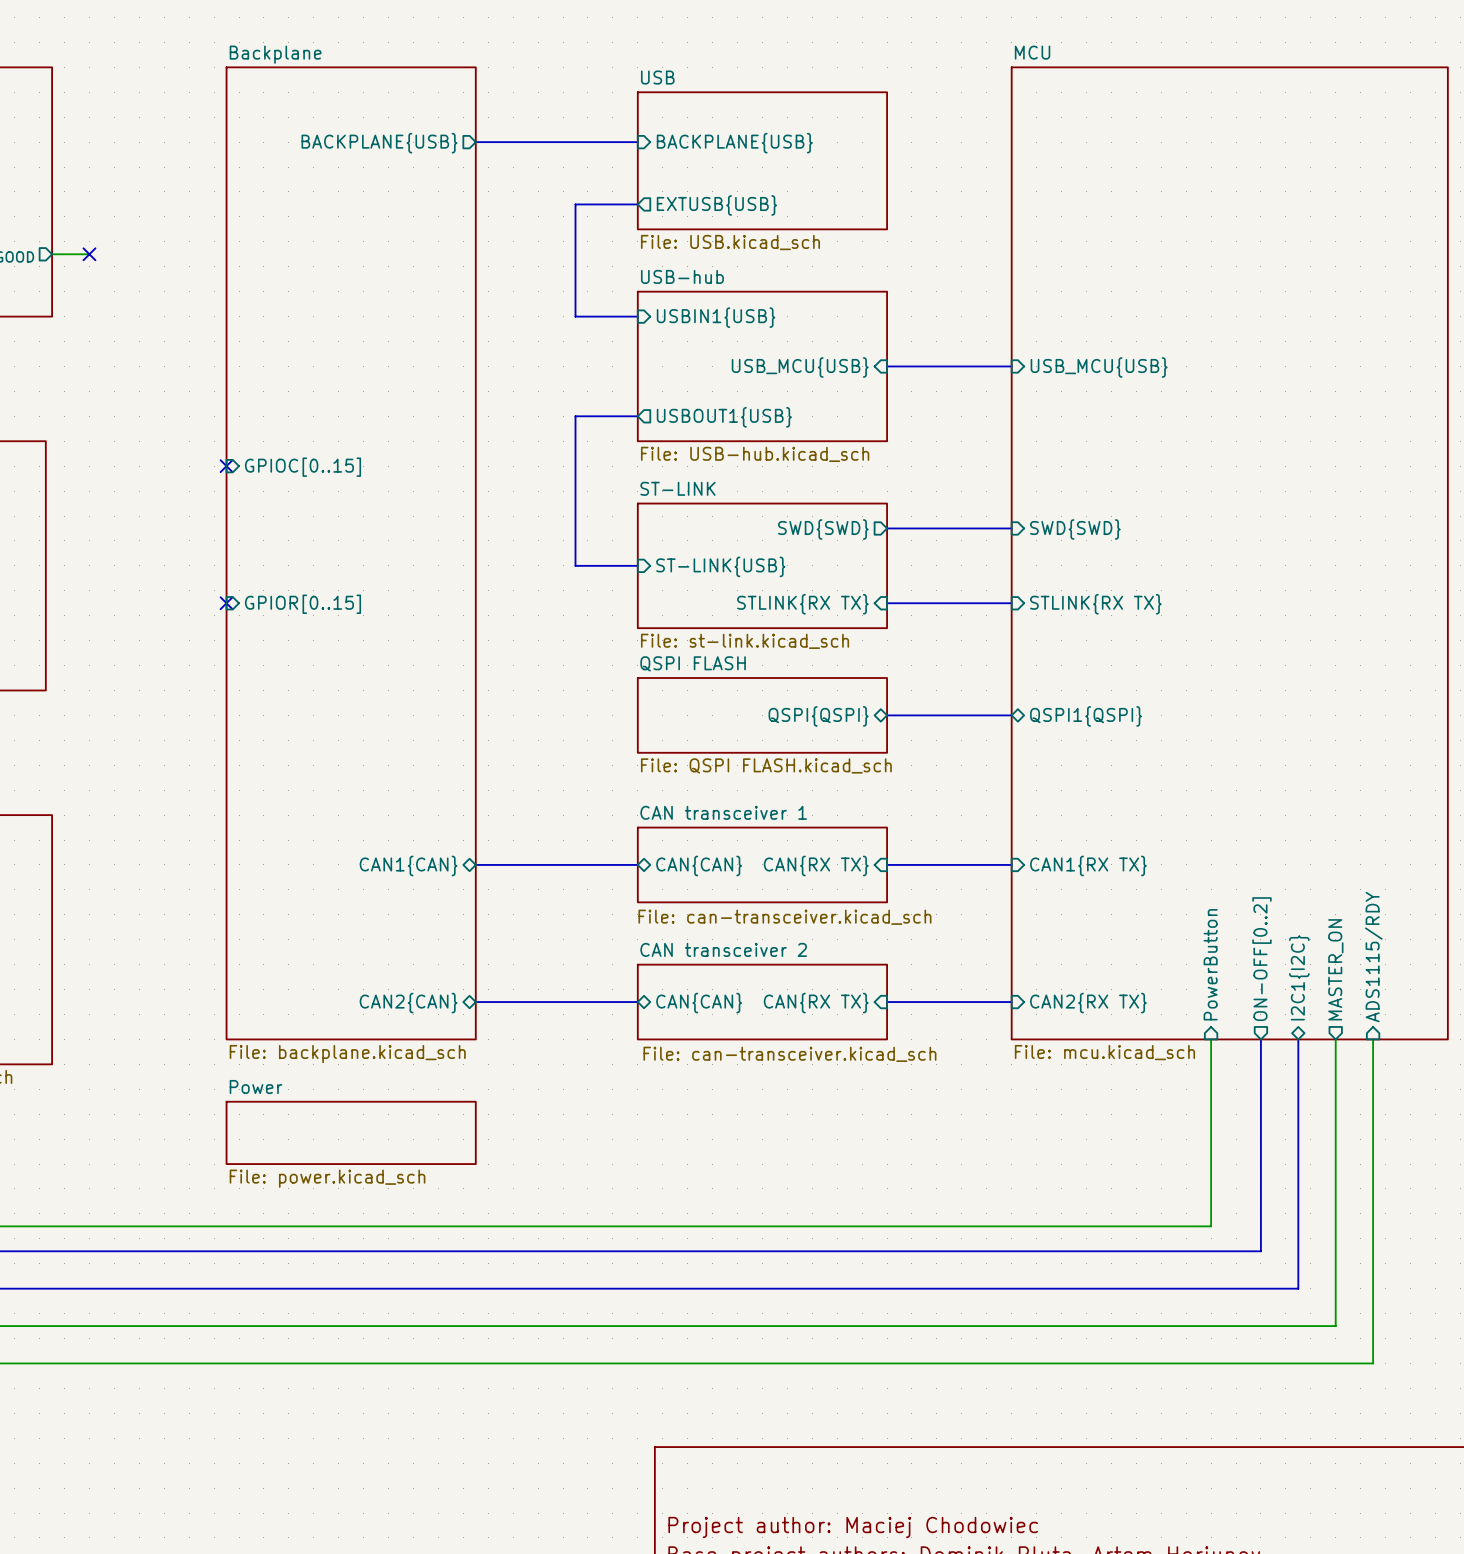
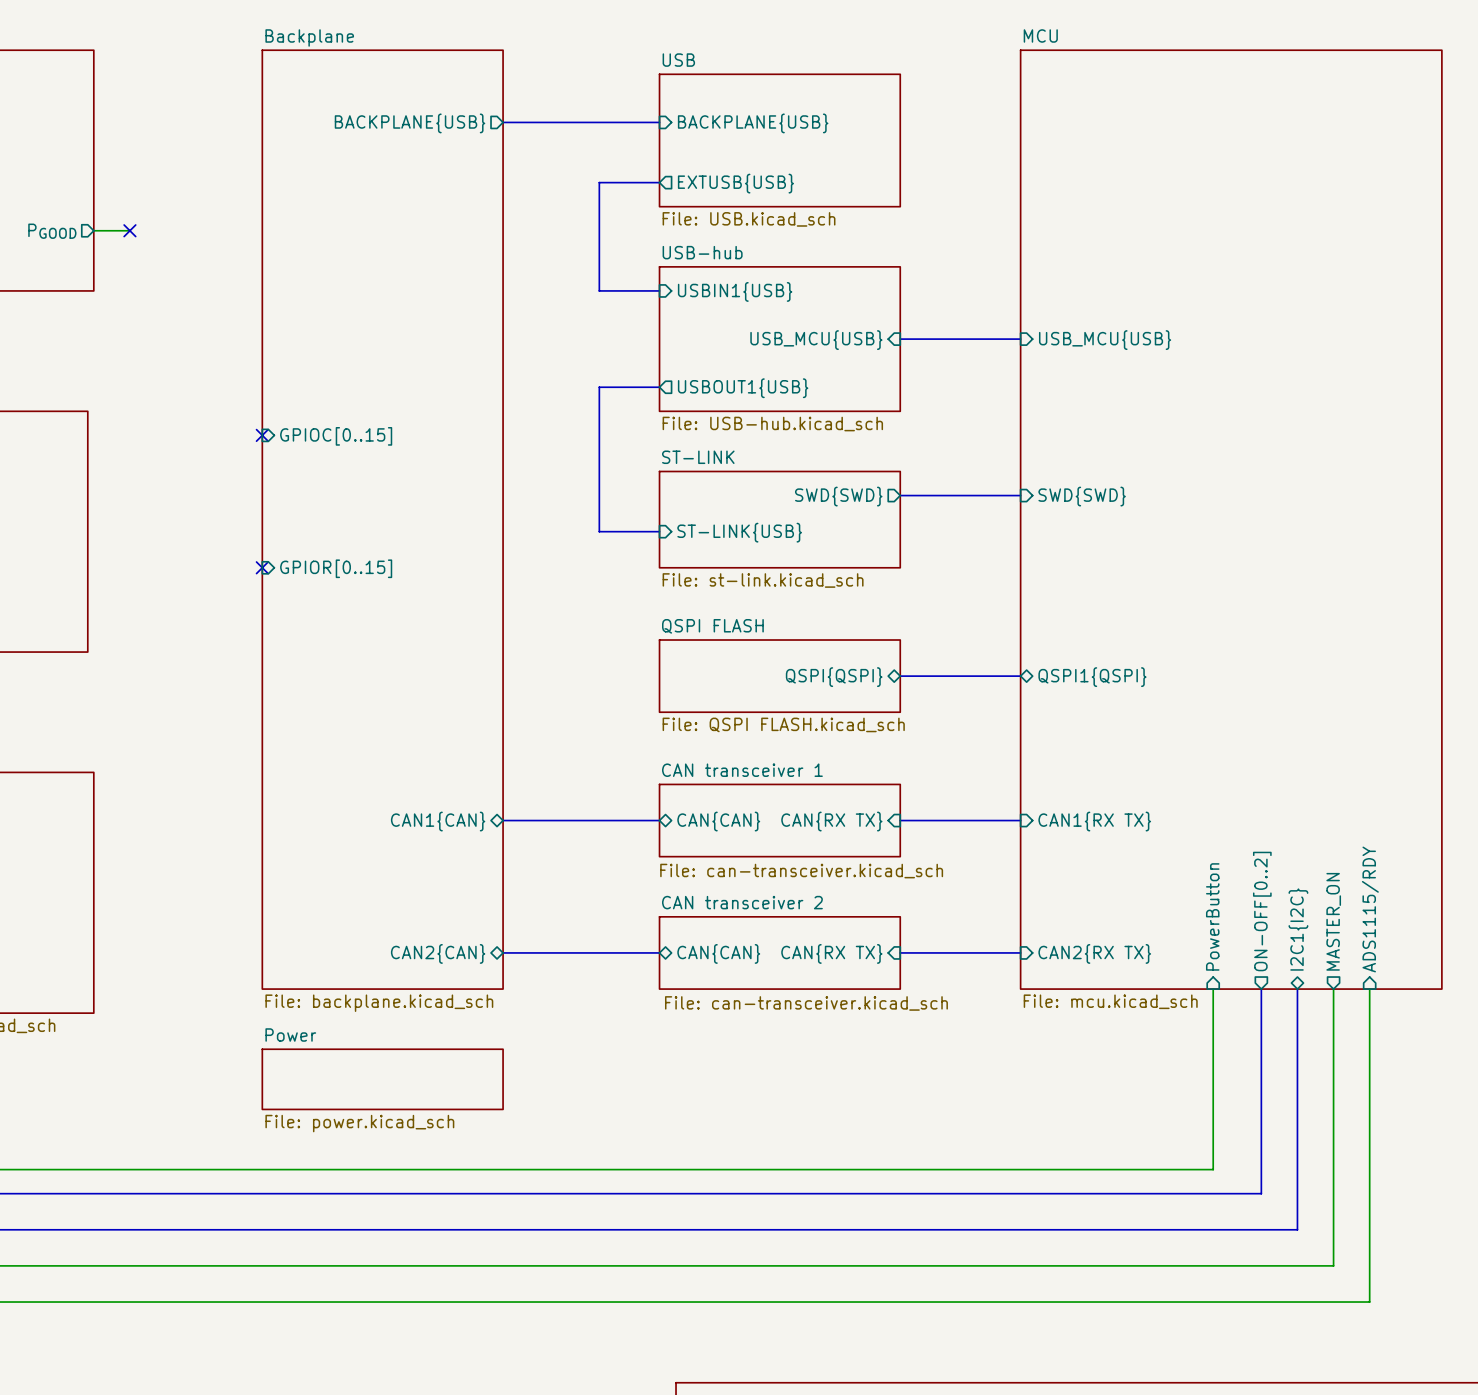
sheet ST-LINK: none -> File: st-link.kicad_sch (779, 519)
sheet ST-LINK: File: st-link.kicad_sch (762, 565) -> none
bus: (887, 603) (1011, 603) -> none
sheet pin: STLINK{RX TX} (802, 604) -> none
sheet pin: STLINK{RX TX} (1095, 604) -> none

